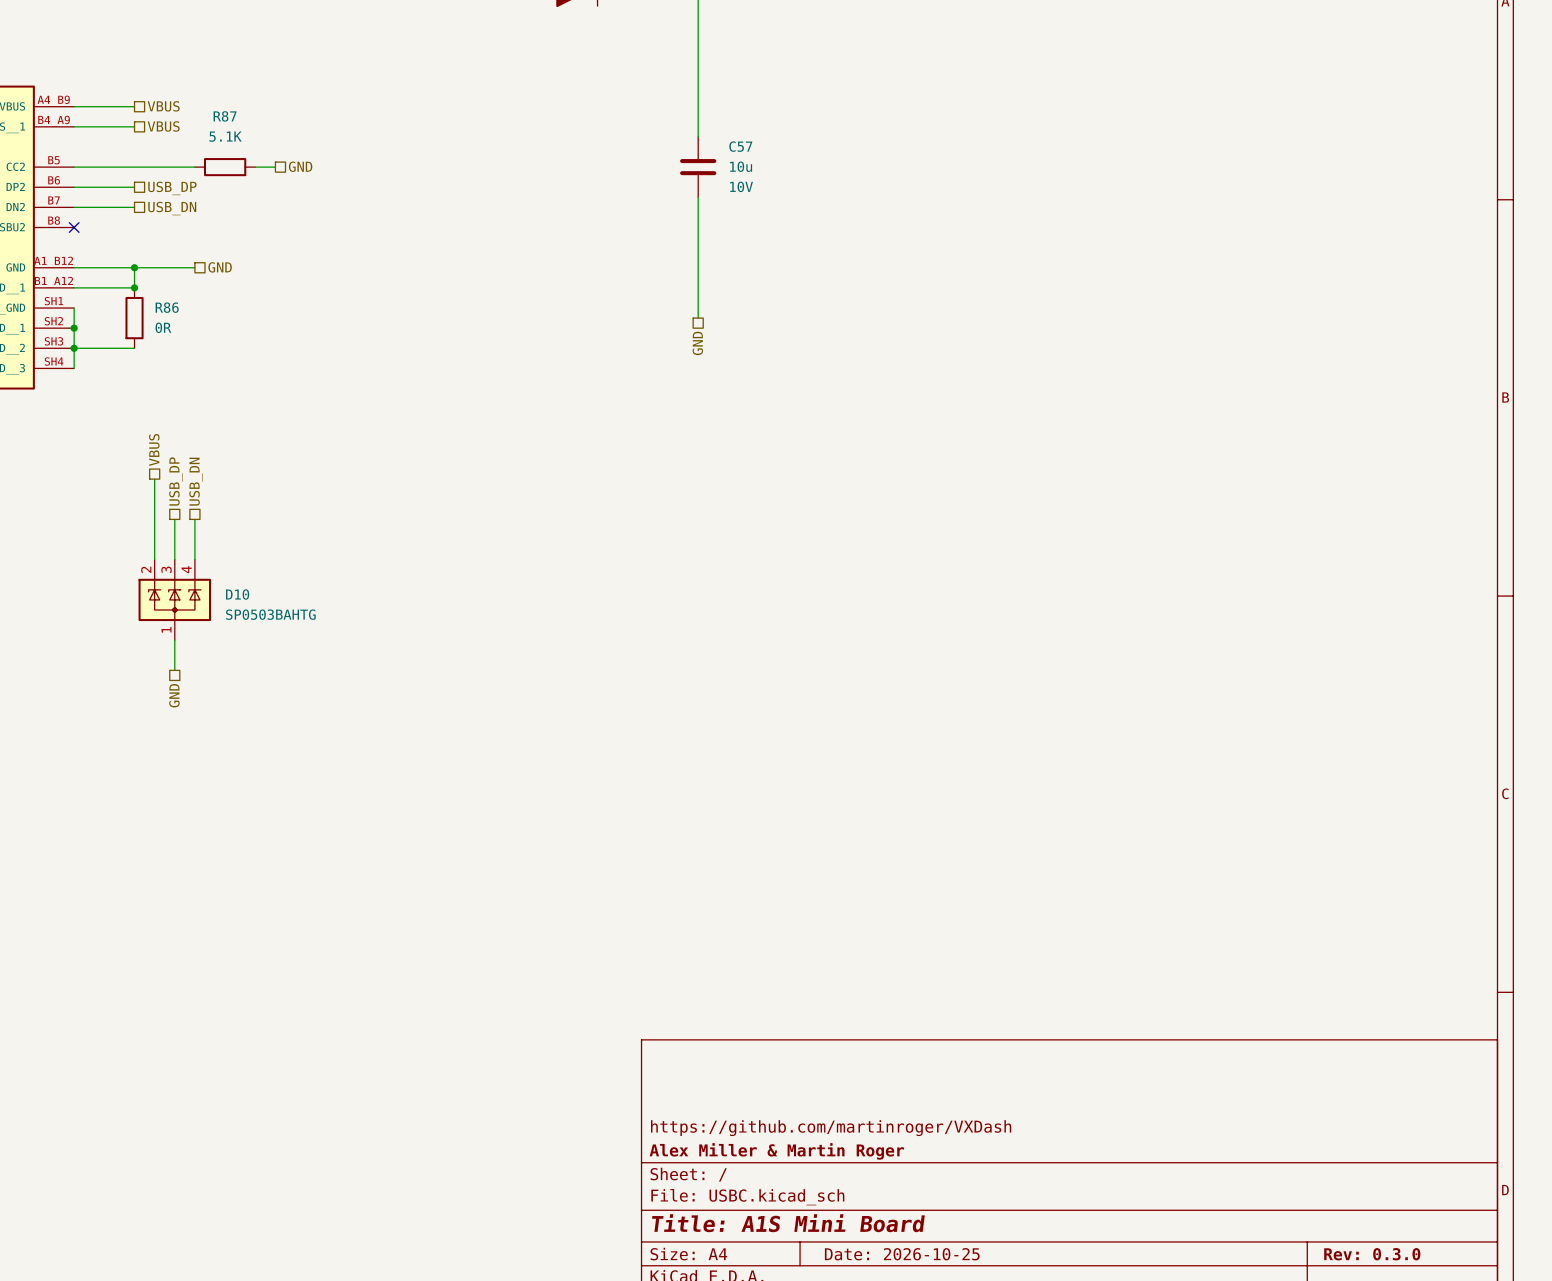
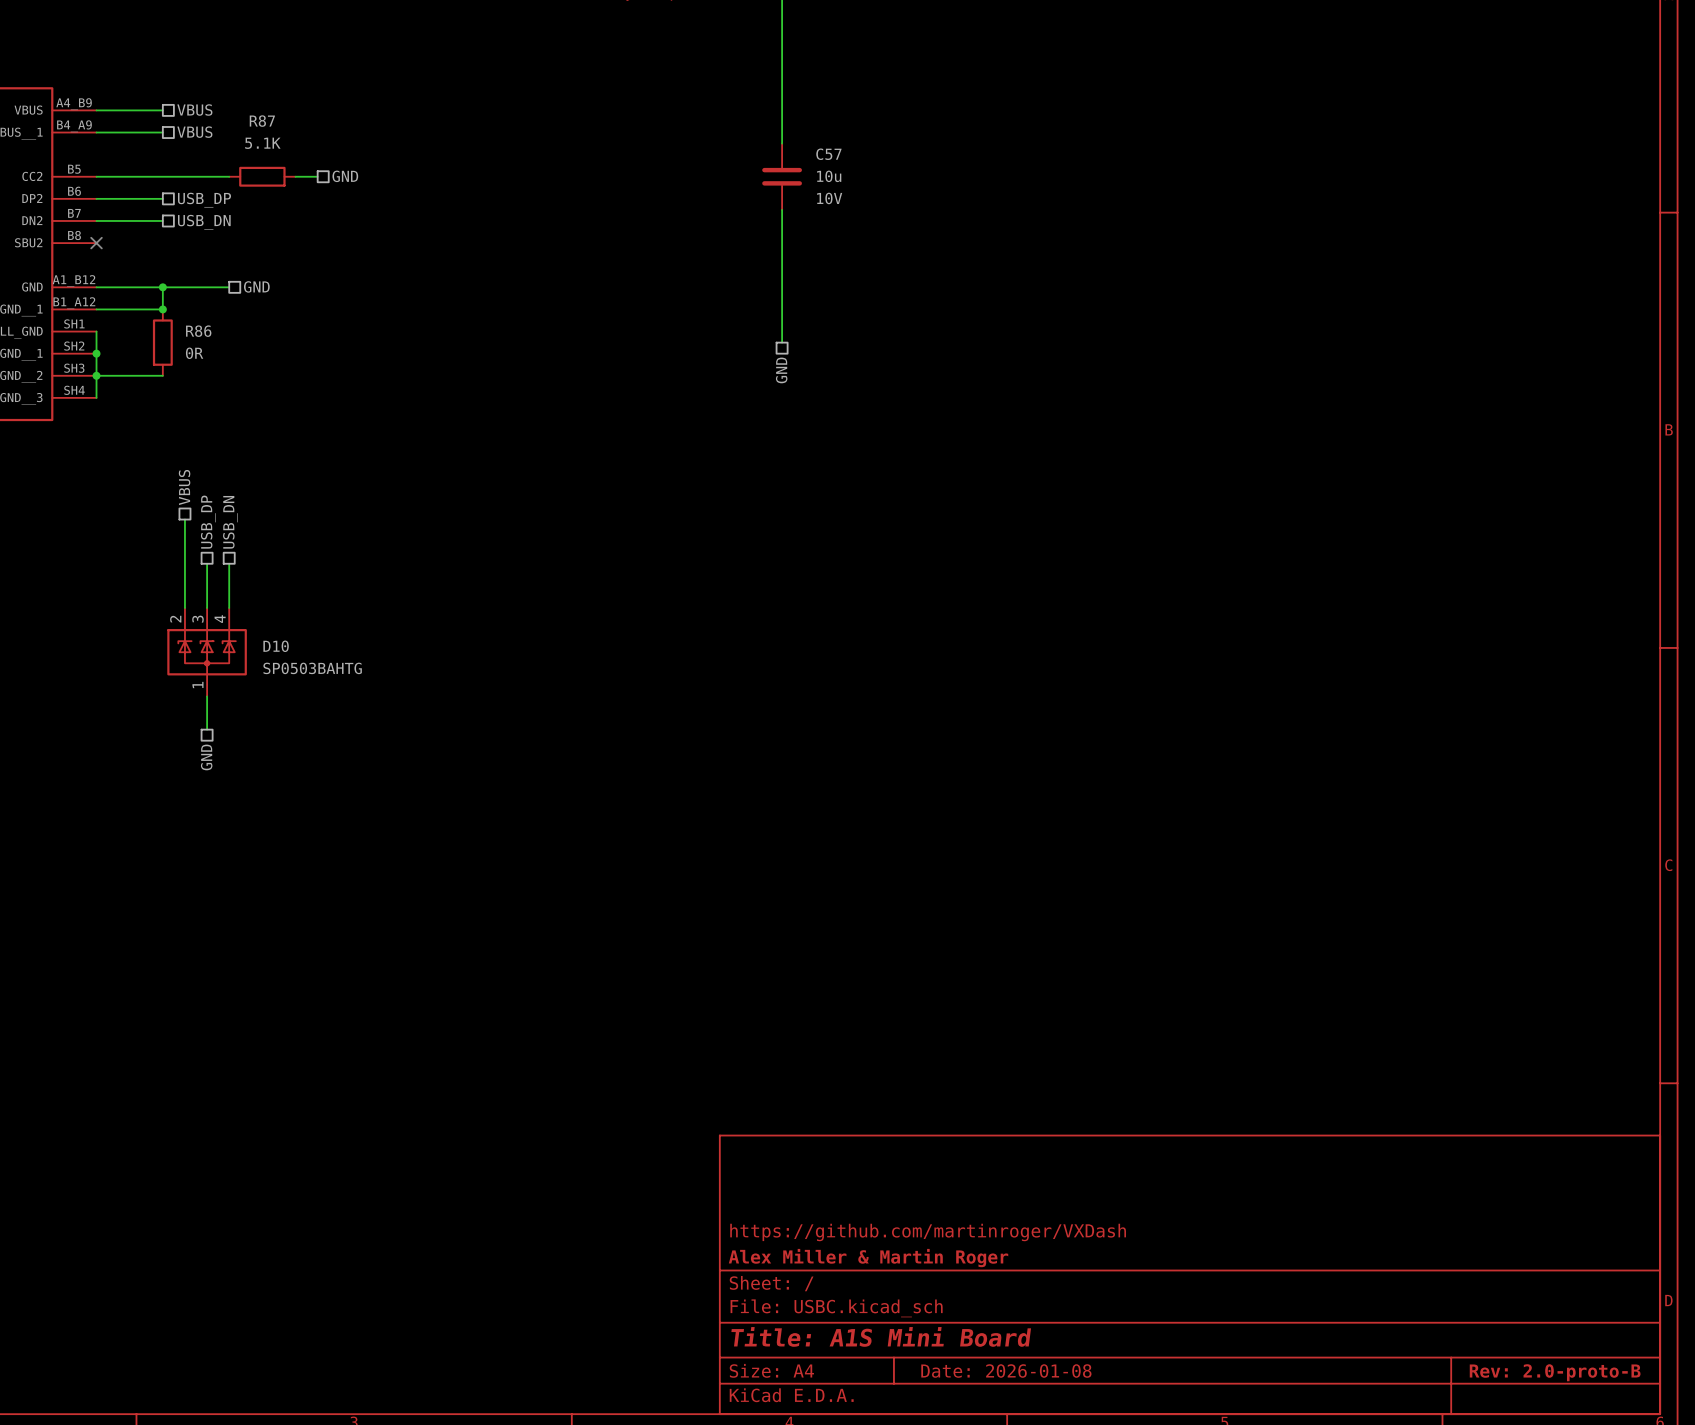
title block: Date: 2026-10-25 (902, 1254) -> Date: 2026-01-08 (1006, 1371)
title block: Rev: 0.3.0 (1372, 1254) -> Rev: 2.0-proto-B (1555, 1372)

